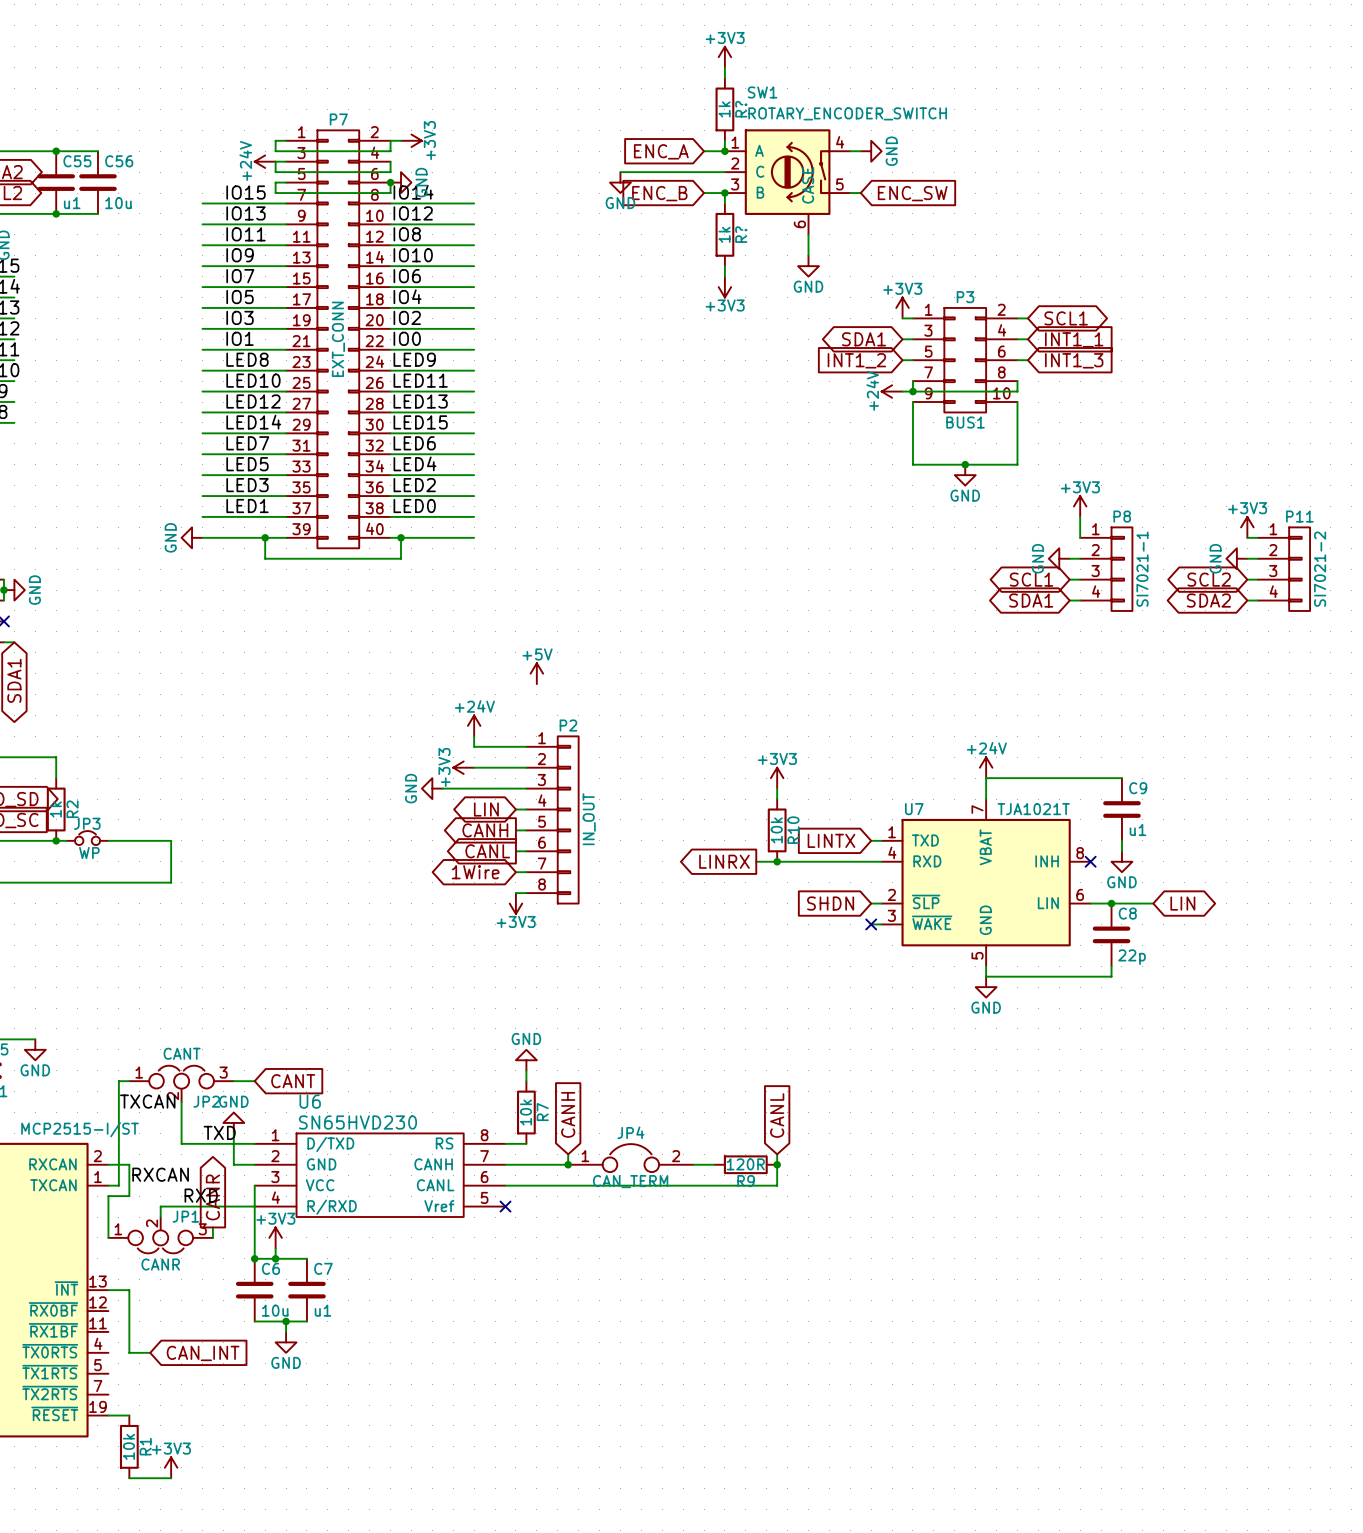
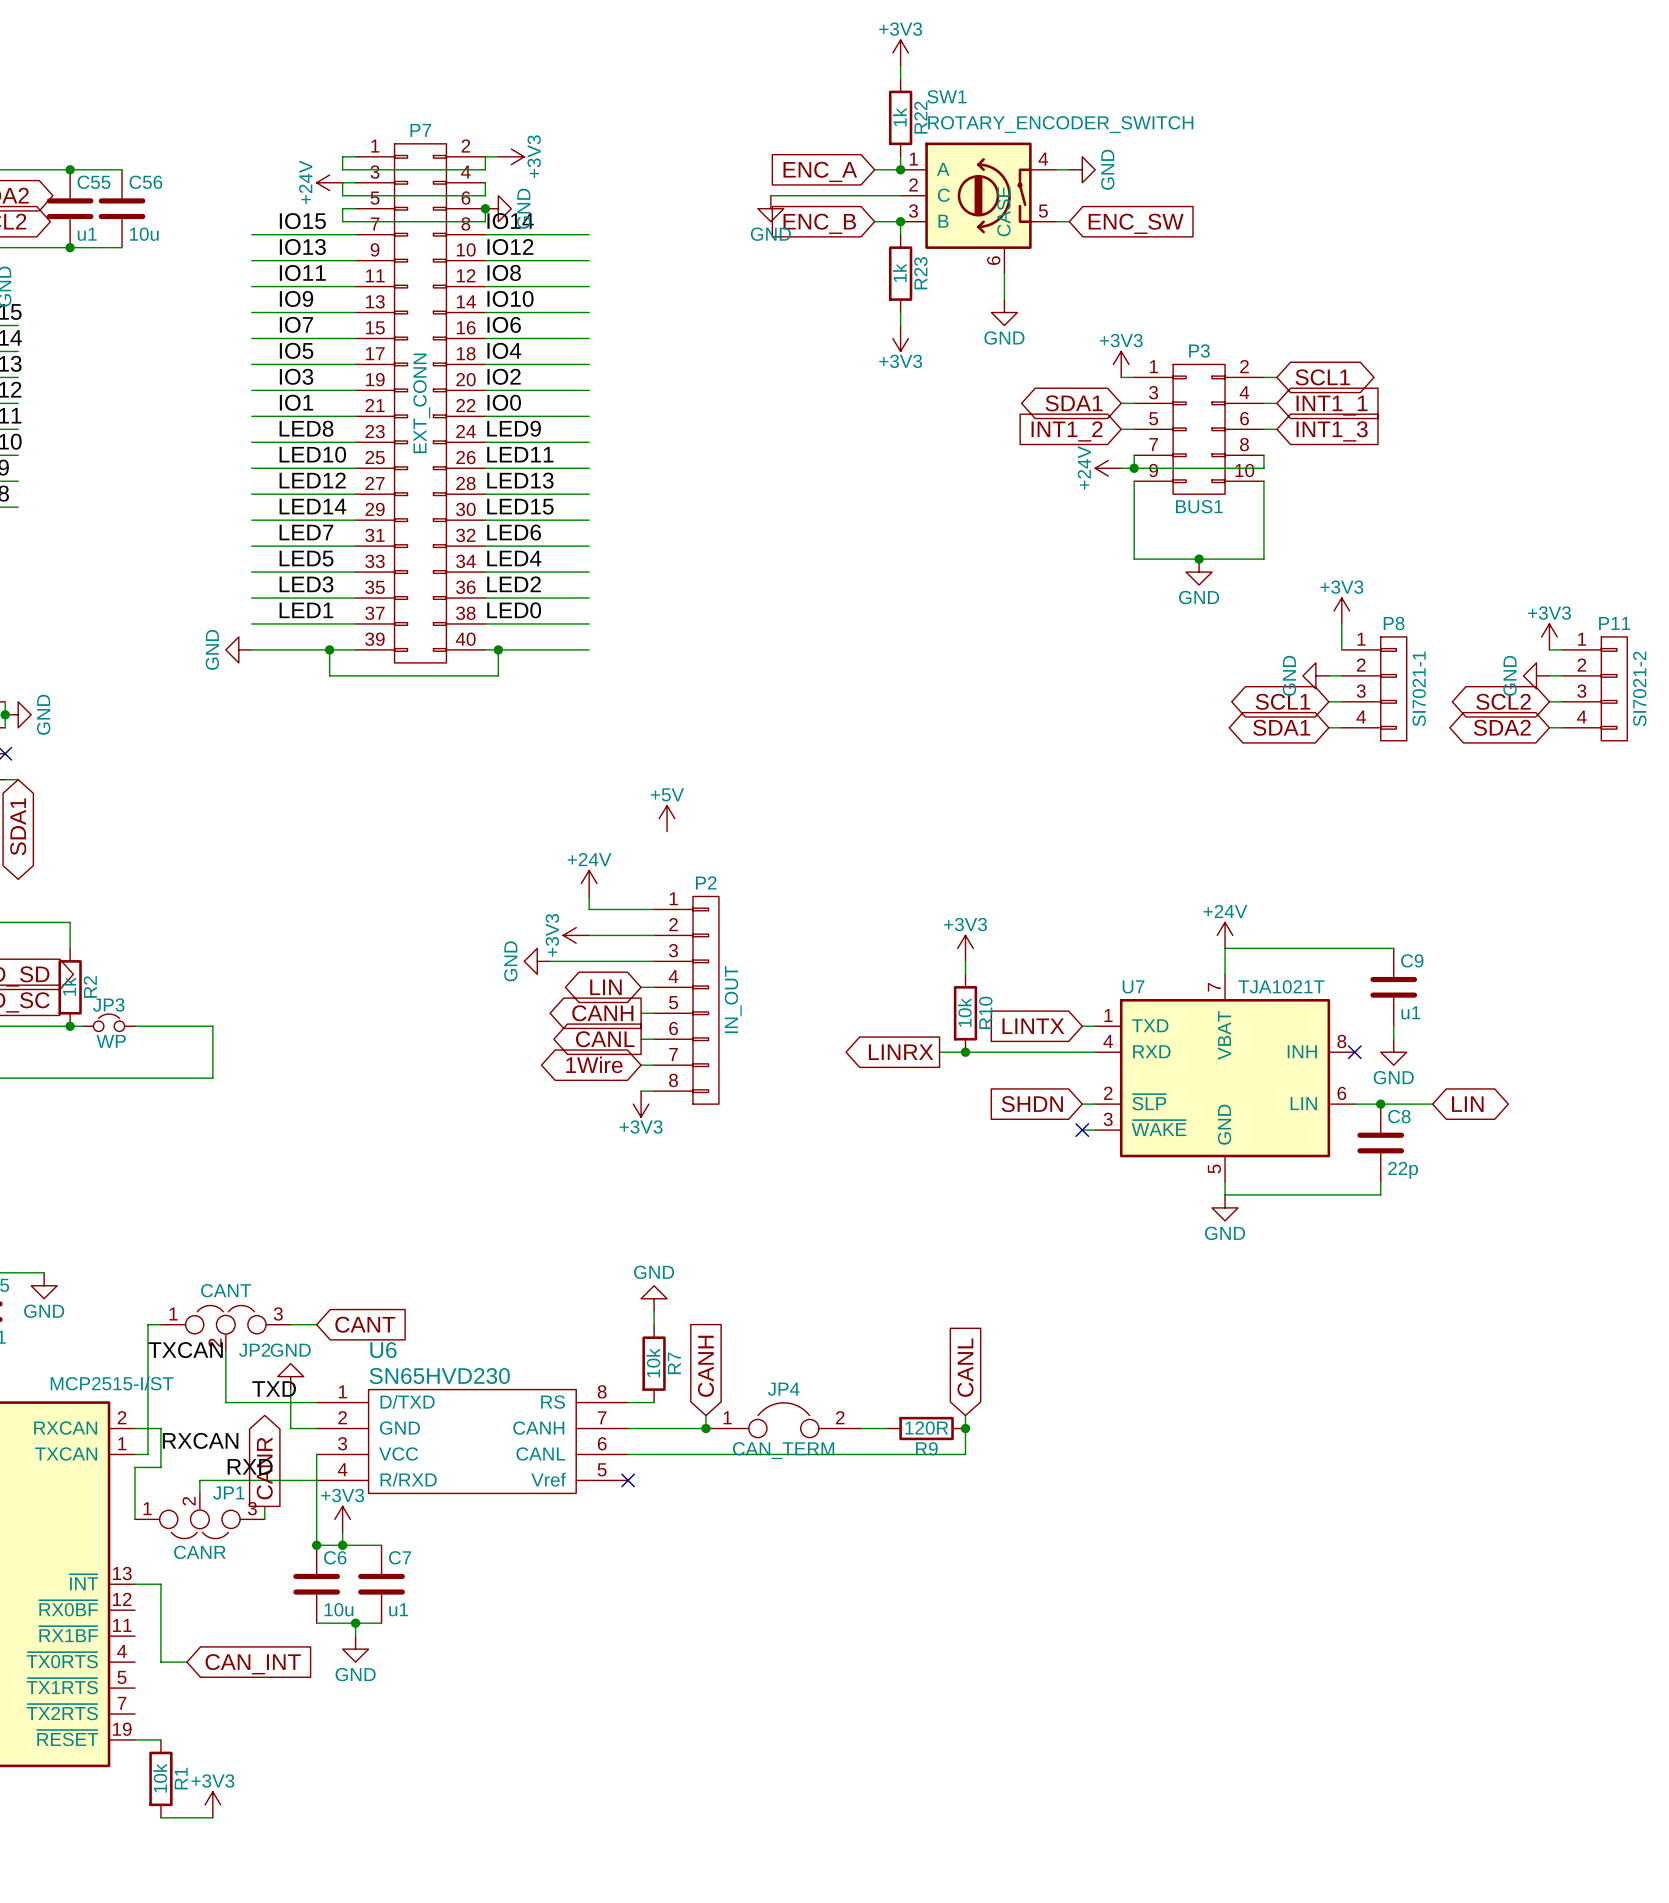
R? name: R? (741, 109) -> R22 (920, 117)
R? name: R? (741, 234) -> R23 (920, 273)

